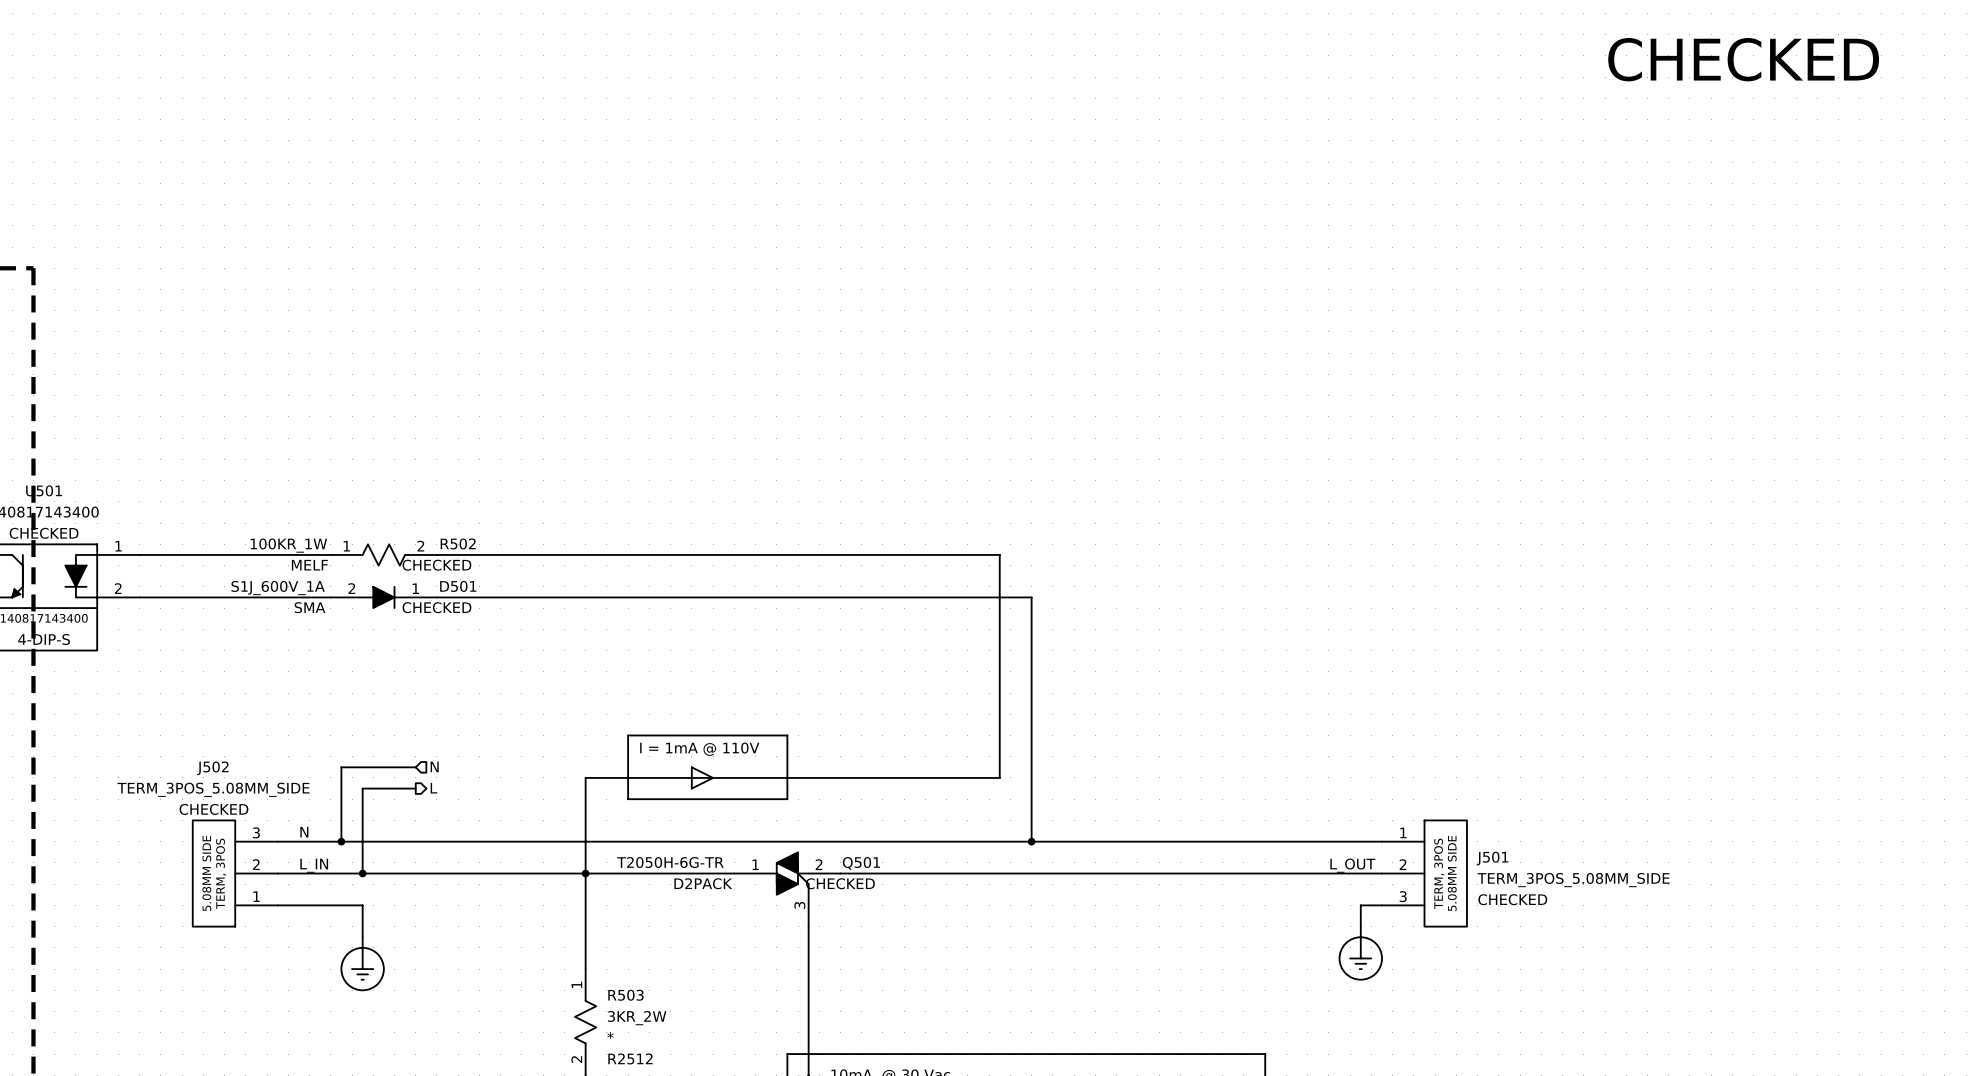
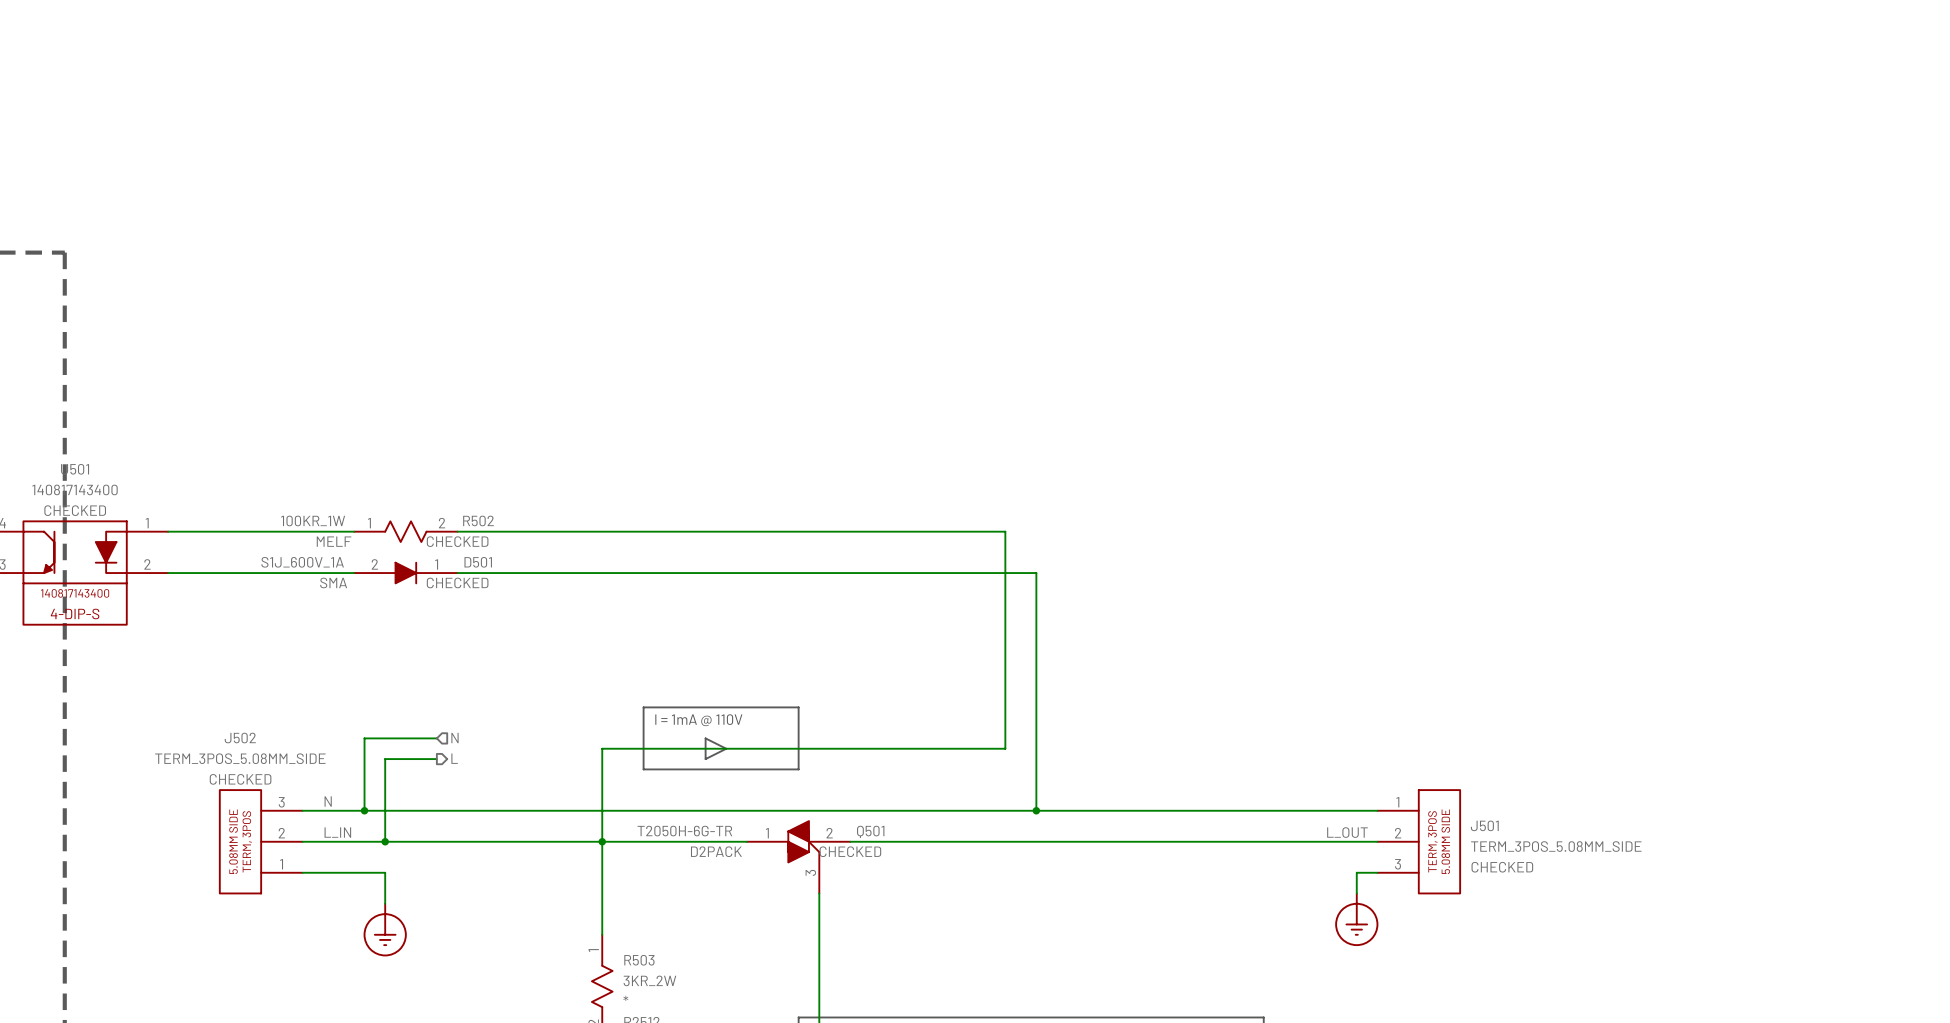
text: CHECKED (1743, 59) -> none

